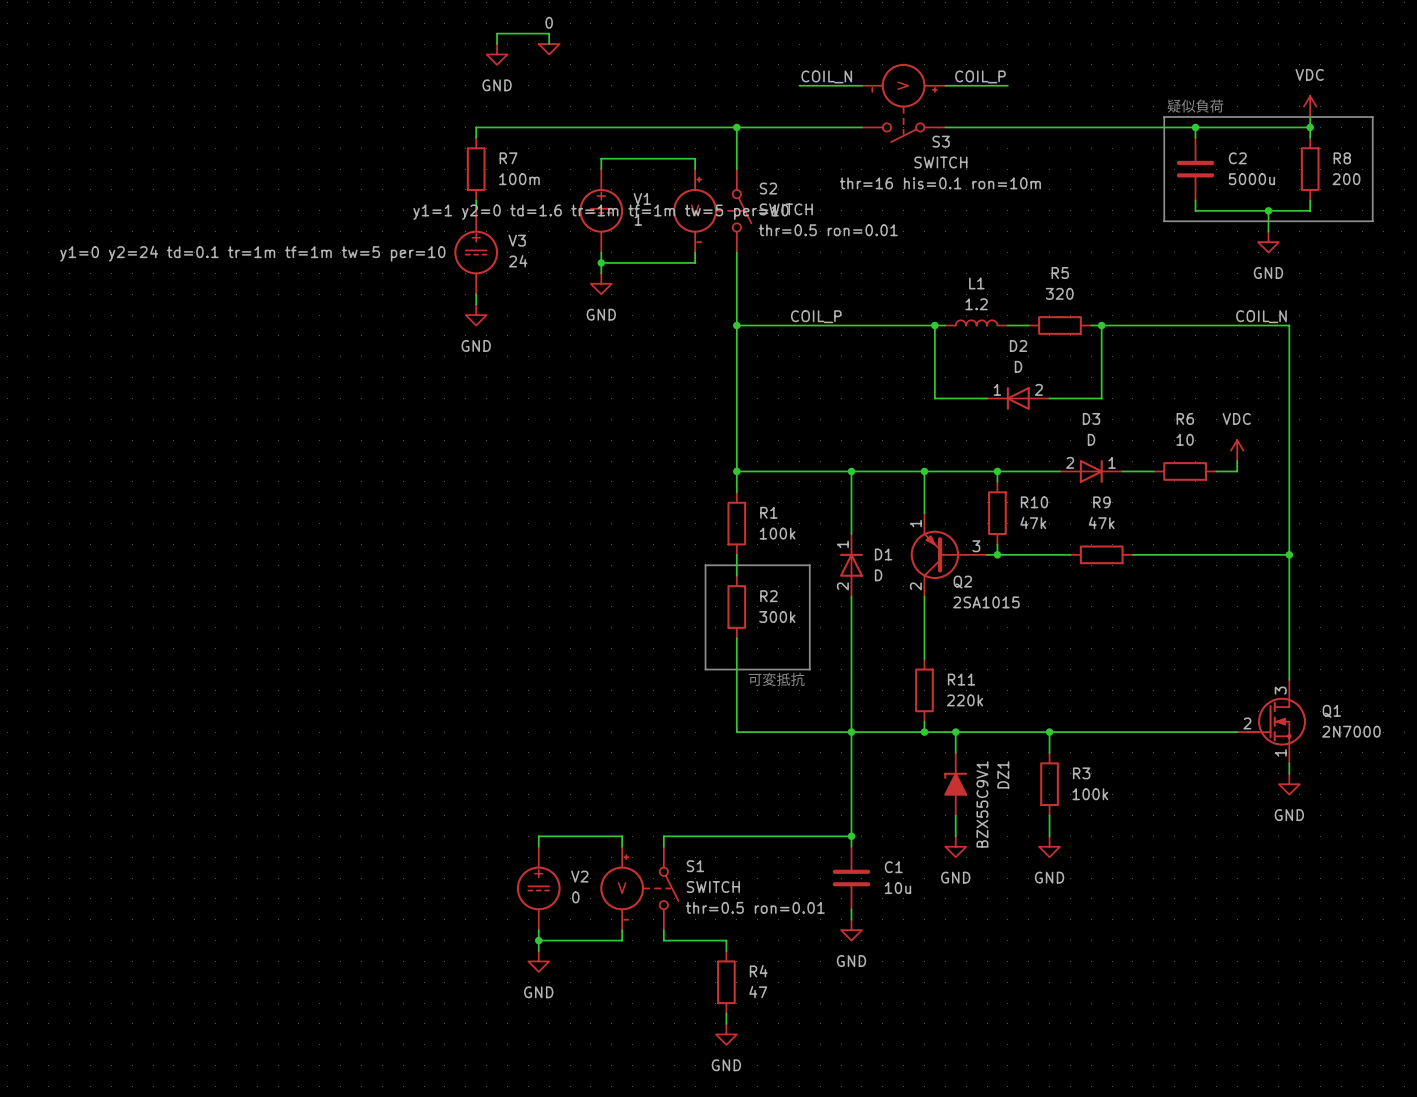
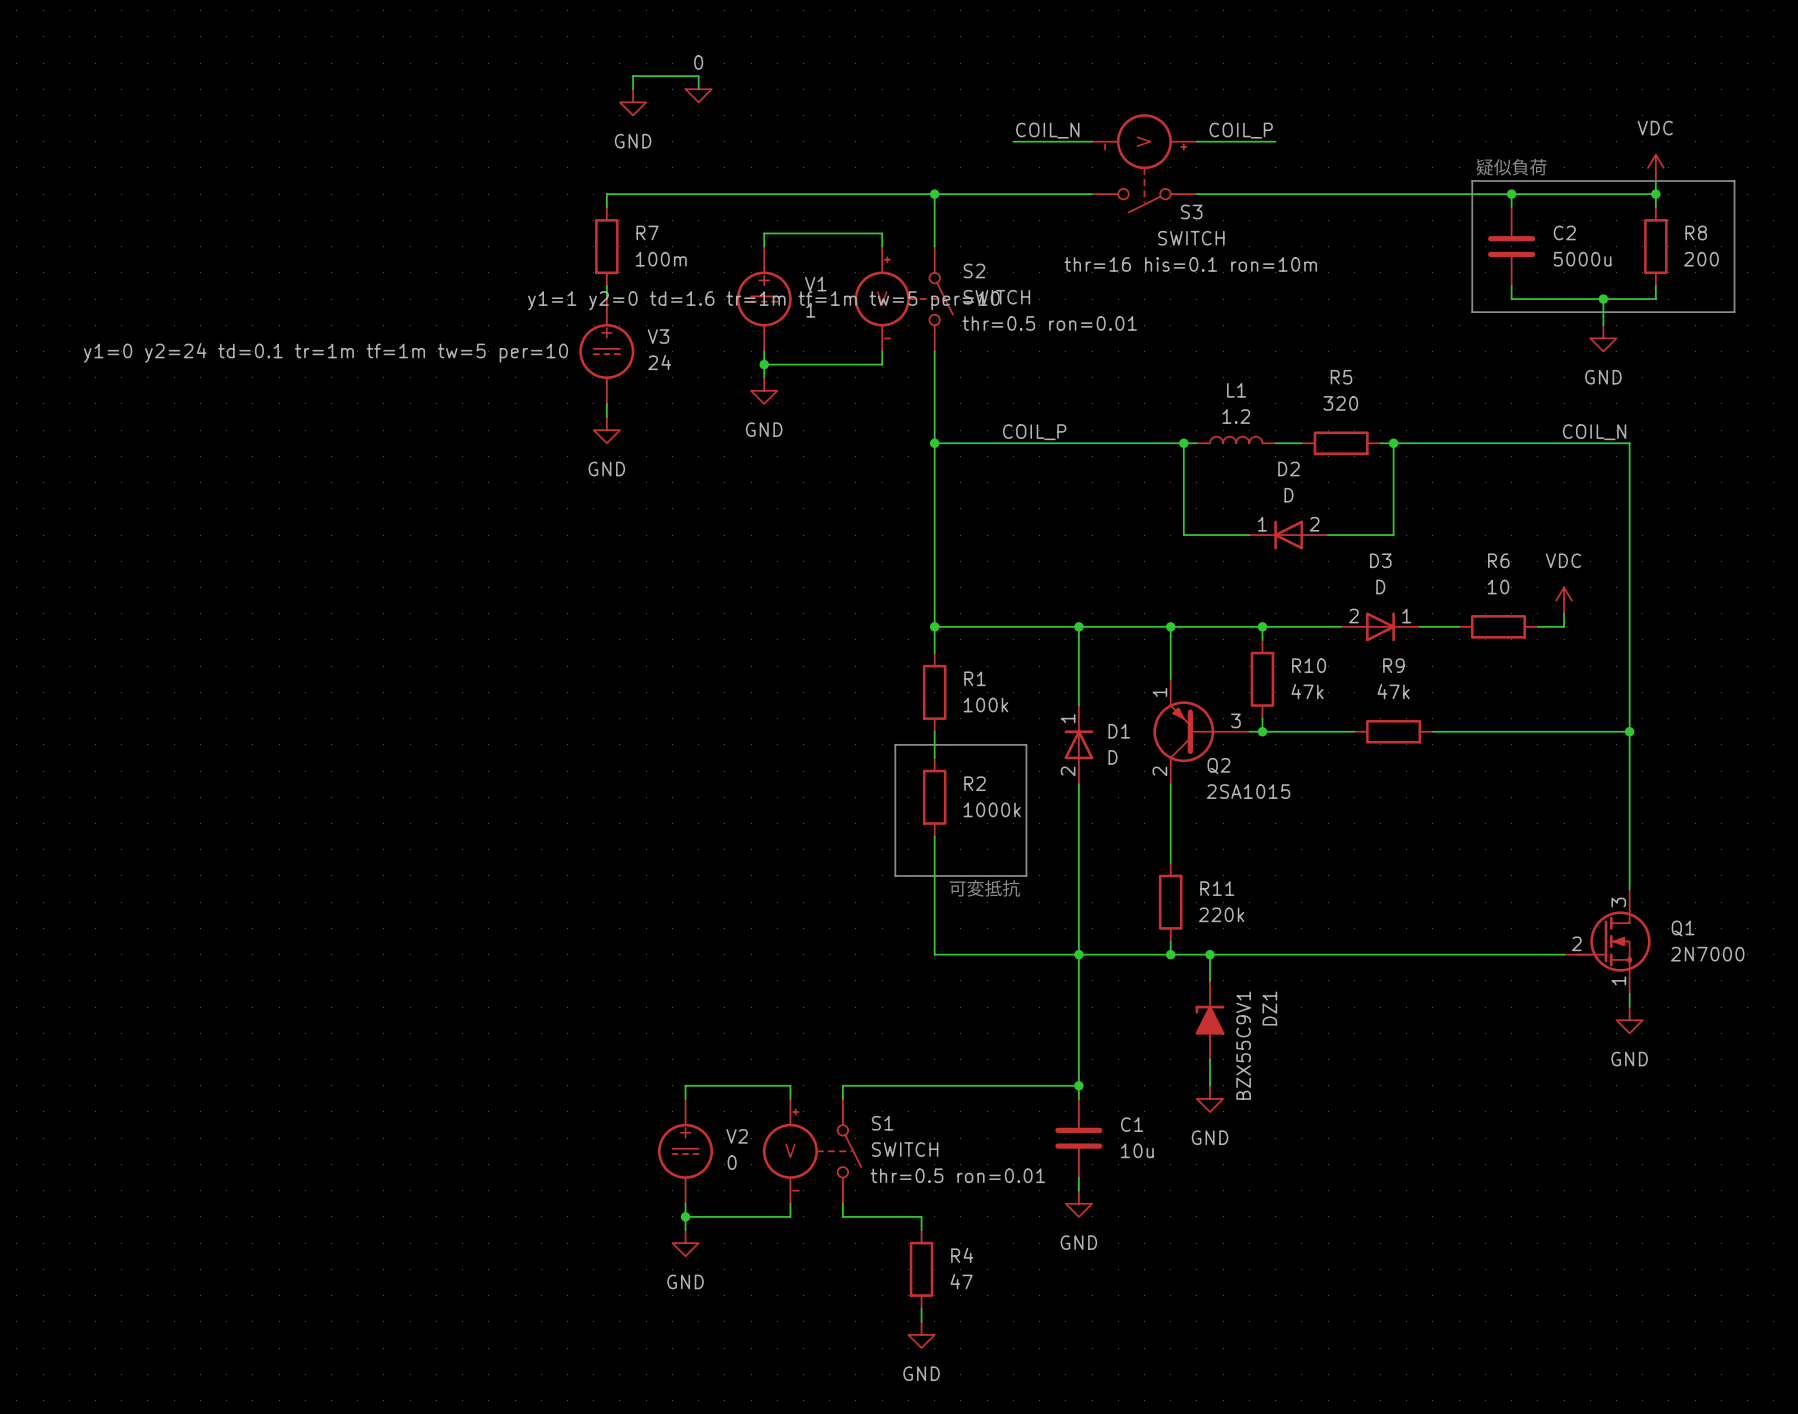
R2 value: 300k (777, 617) -> 1000k (992, 809)
wire: (1049, 732) (1049, 752) -> none
junction: (1049, 732) -> none
R3: 100k (1049, 784) -> none
wire: (1049, 815) (1049, 836) -> none
power symbol: GND (1049, 846) -> none

